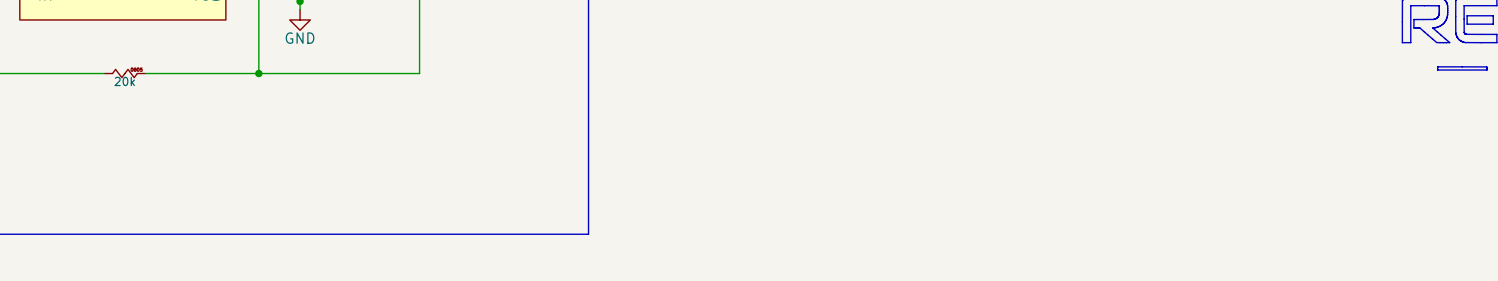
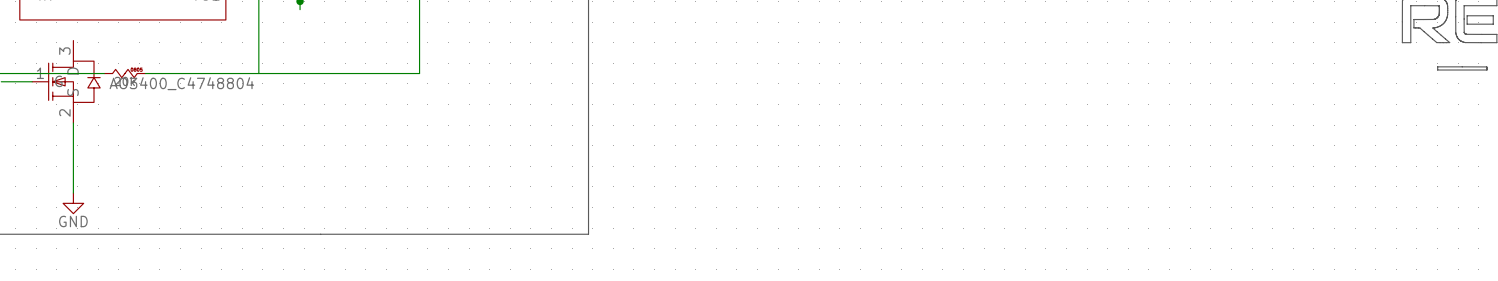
power symbol: GND (300, 19) -> none
junction: (258, 73) -> none
wire: none -> (1, 81) (32, 81)
part: none -> AO3400_C4748804 (66, 81)
wire: none -> (73, 122) (73, 193)
power symbol: none -> GND (73, 203)

